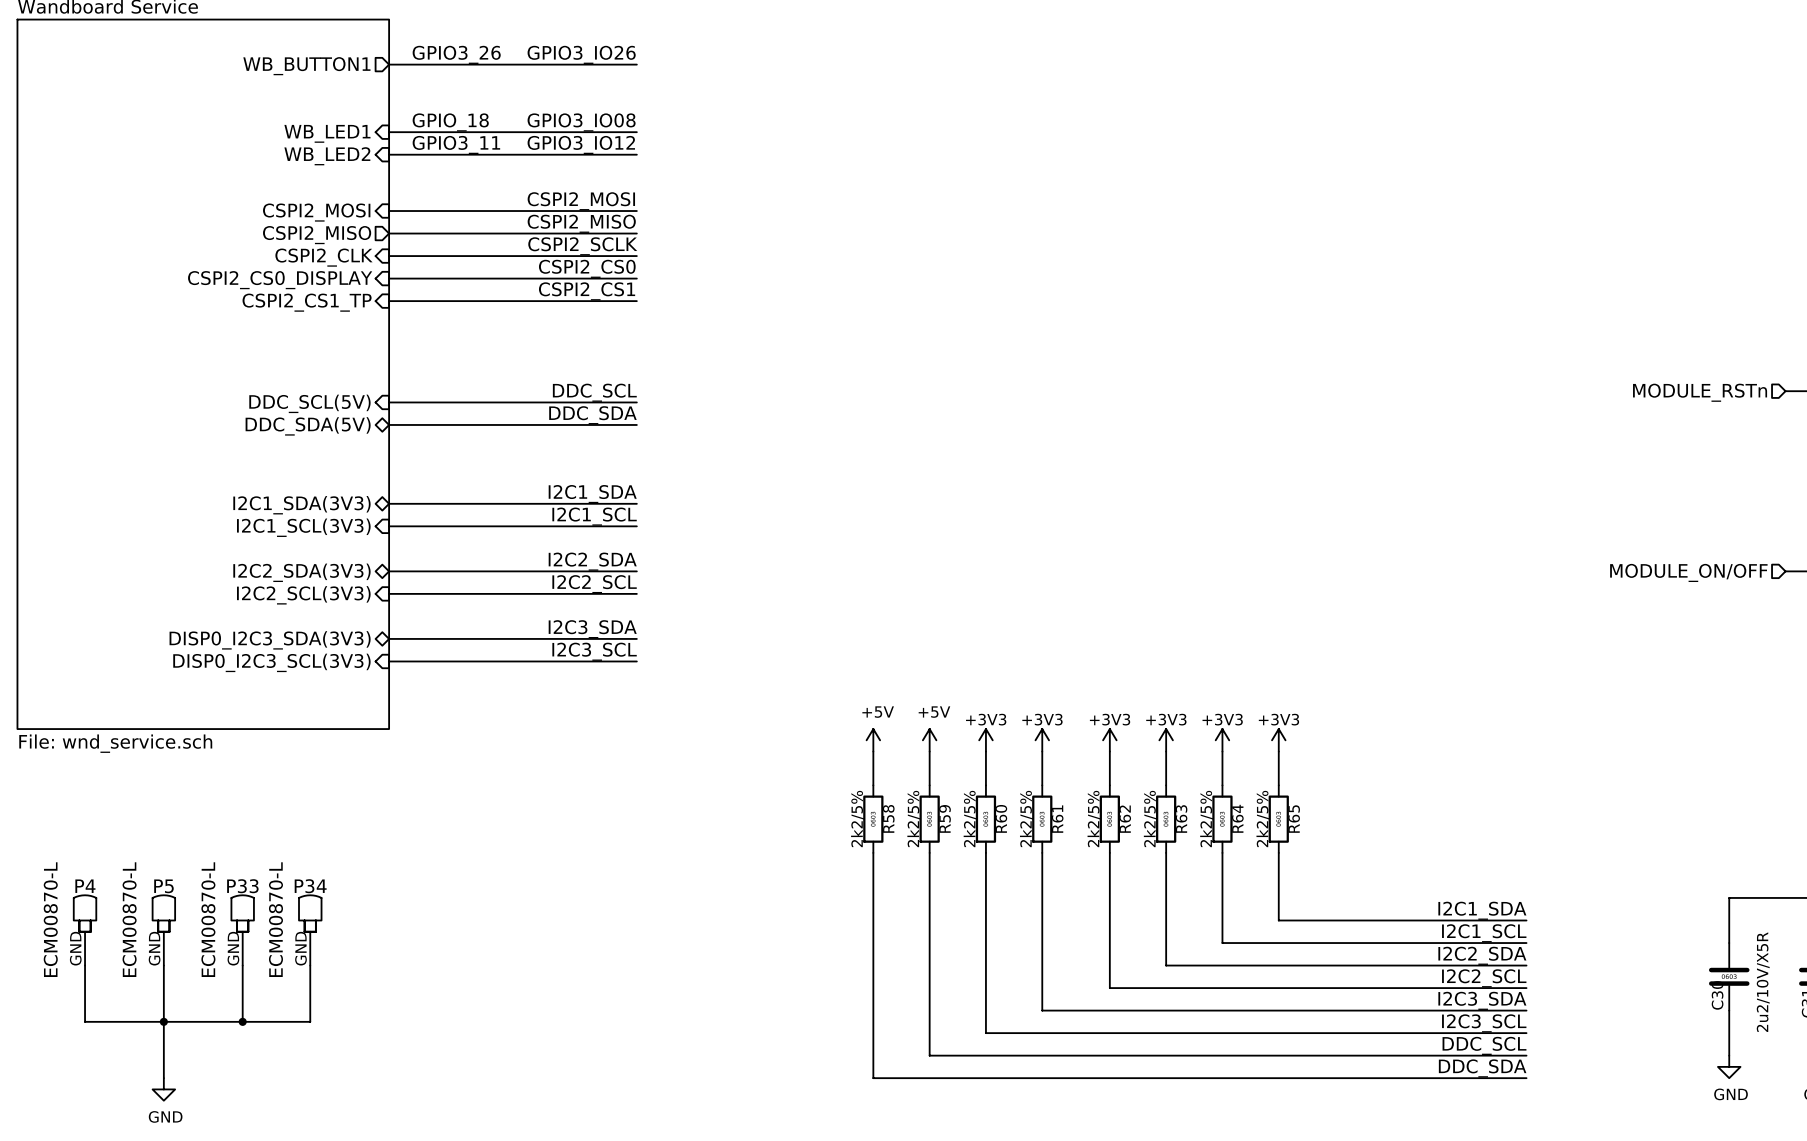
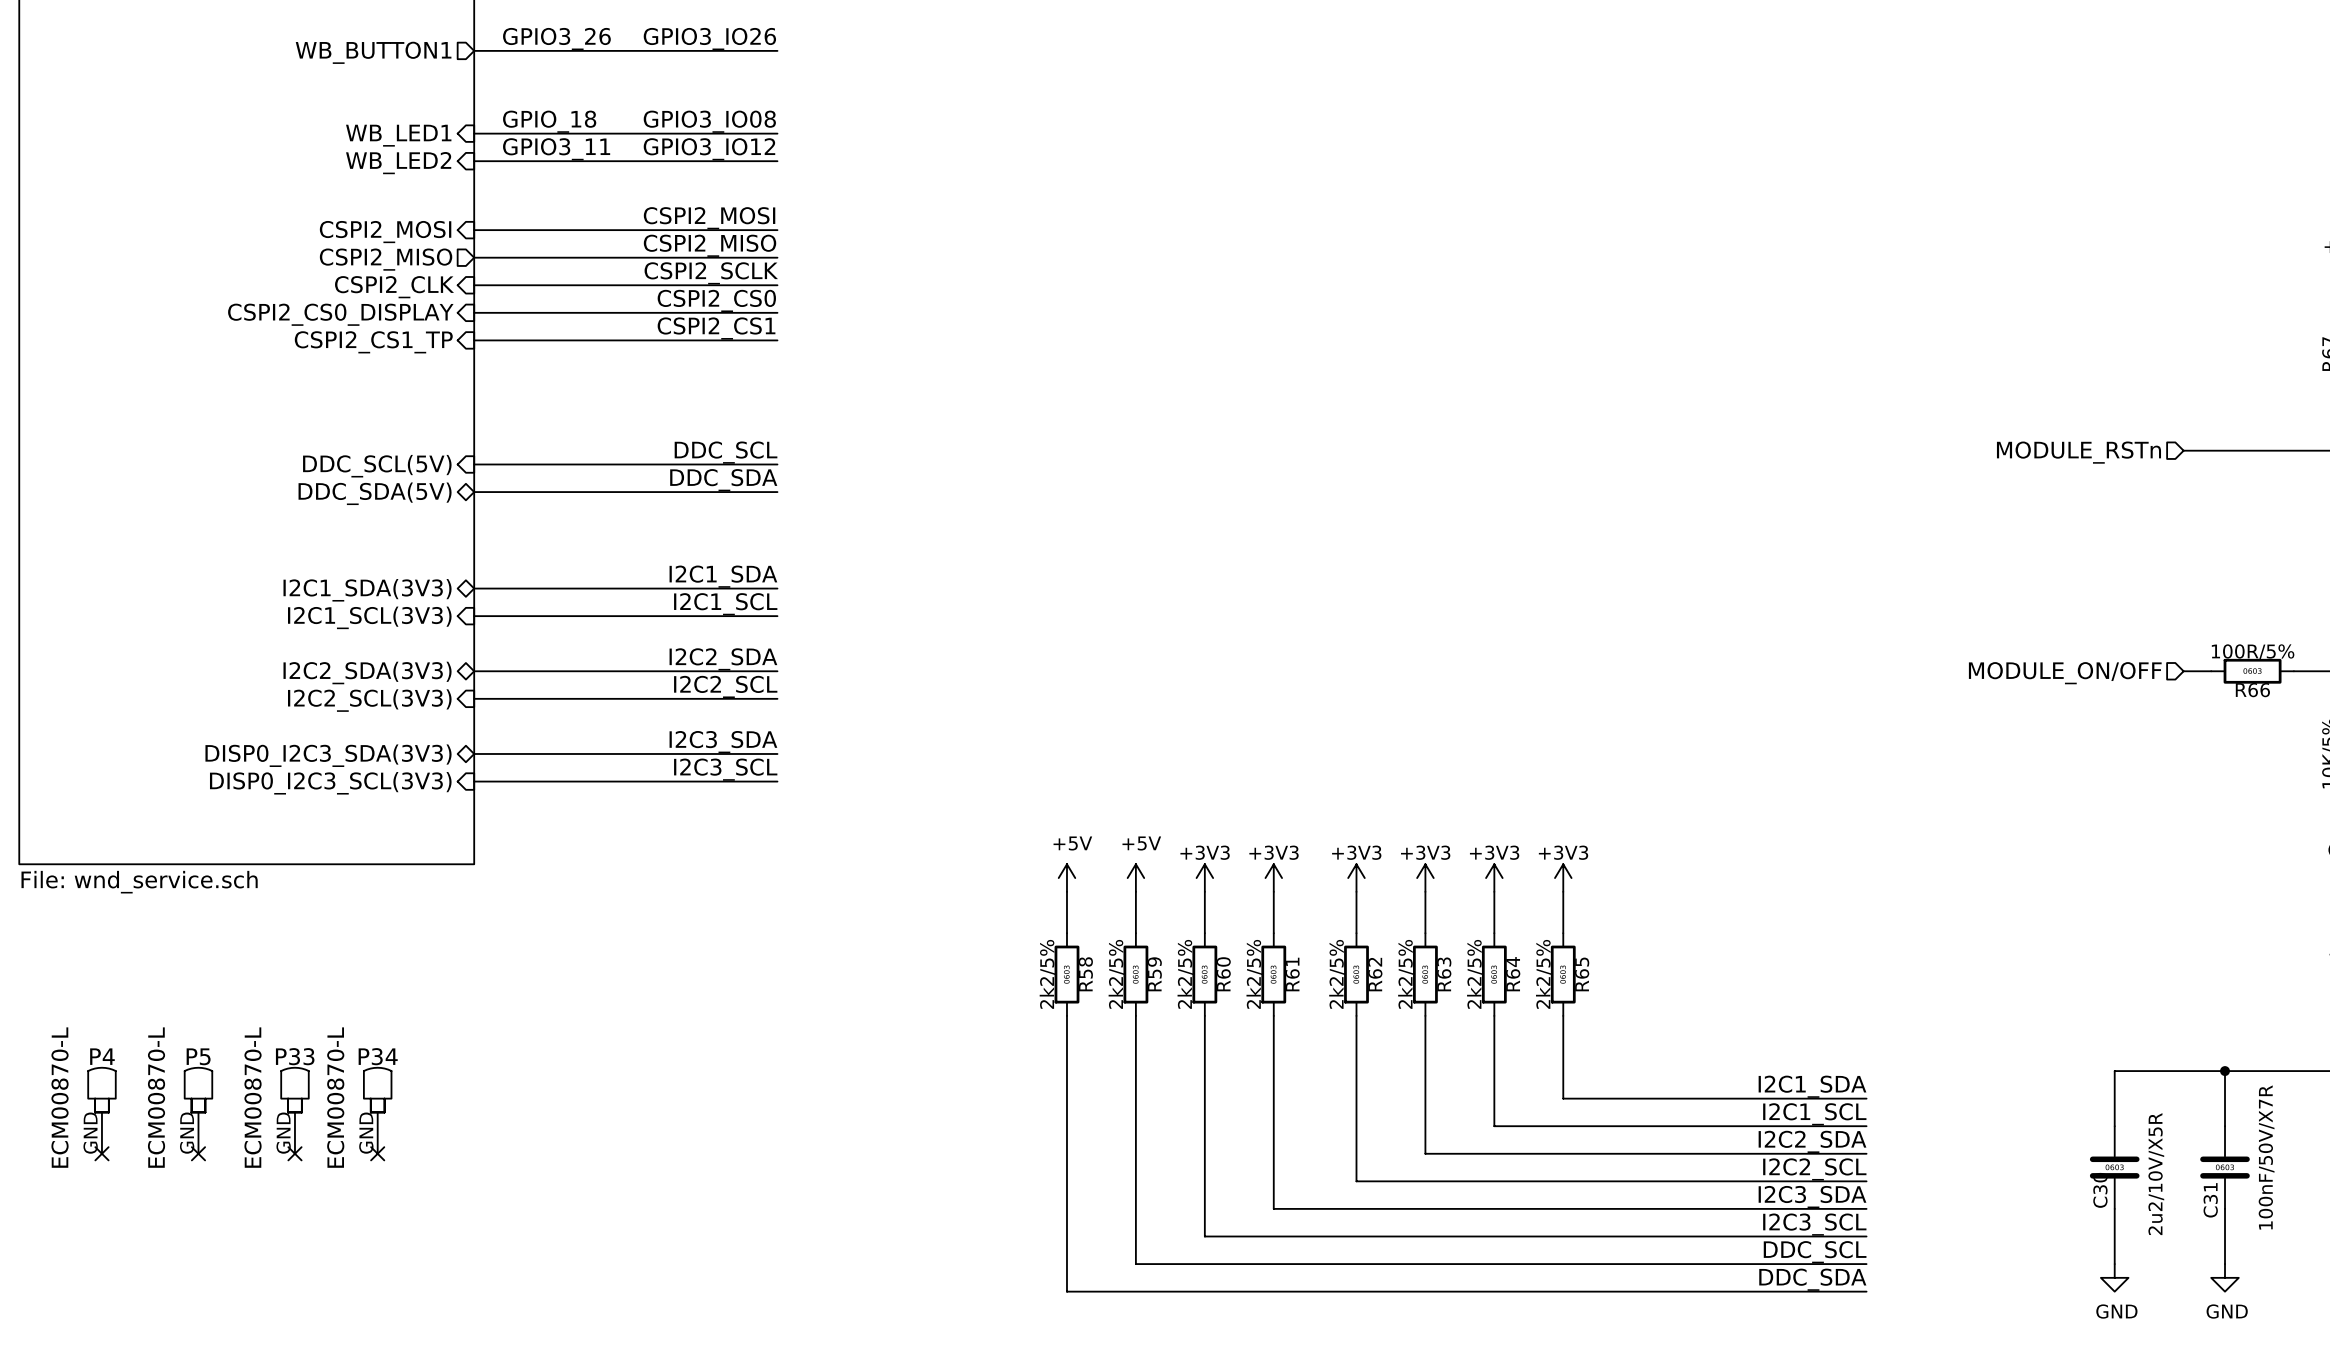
wire: (85, 965) (85, 1021) (310, 1021) (310, 965) -> none
no-connect mark: none -> (101, 1153)
wire: (163, 965) (163, 1078) -> none
no-connect mark: none -> (198, 1153)
wire: (242, 965) (242, 1021) -> none
no-connect mark: none -> (294, 1153)
no-connect mark: none -> (377, 1153)
junction: (163, 1021) -> none
junction: (242, 1021) -> none
power symbol: GND (163, 1089) -> none

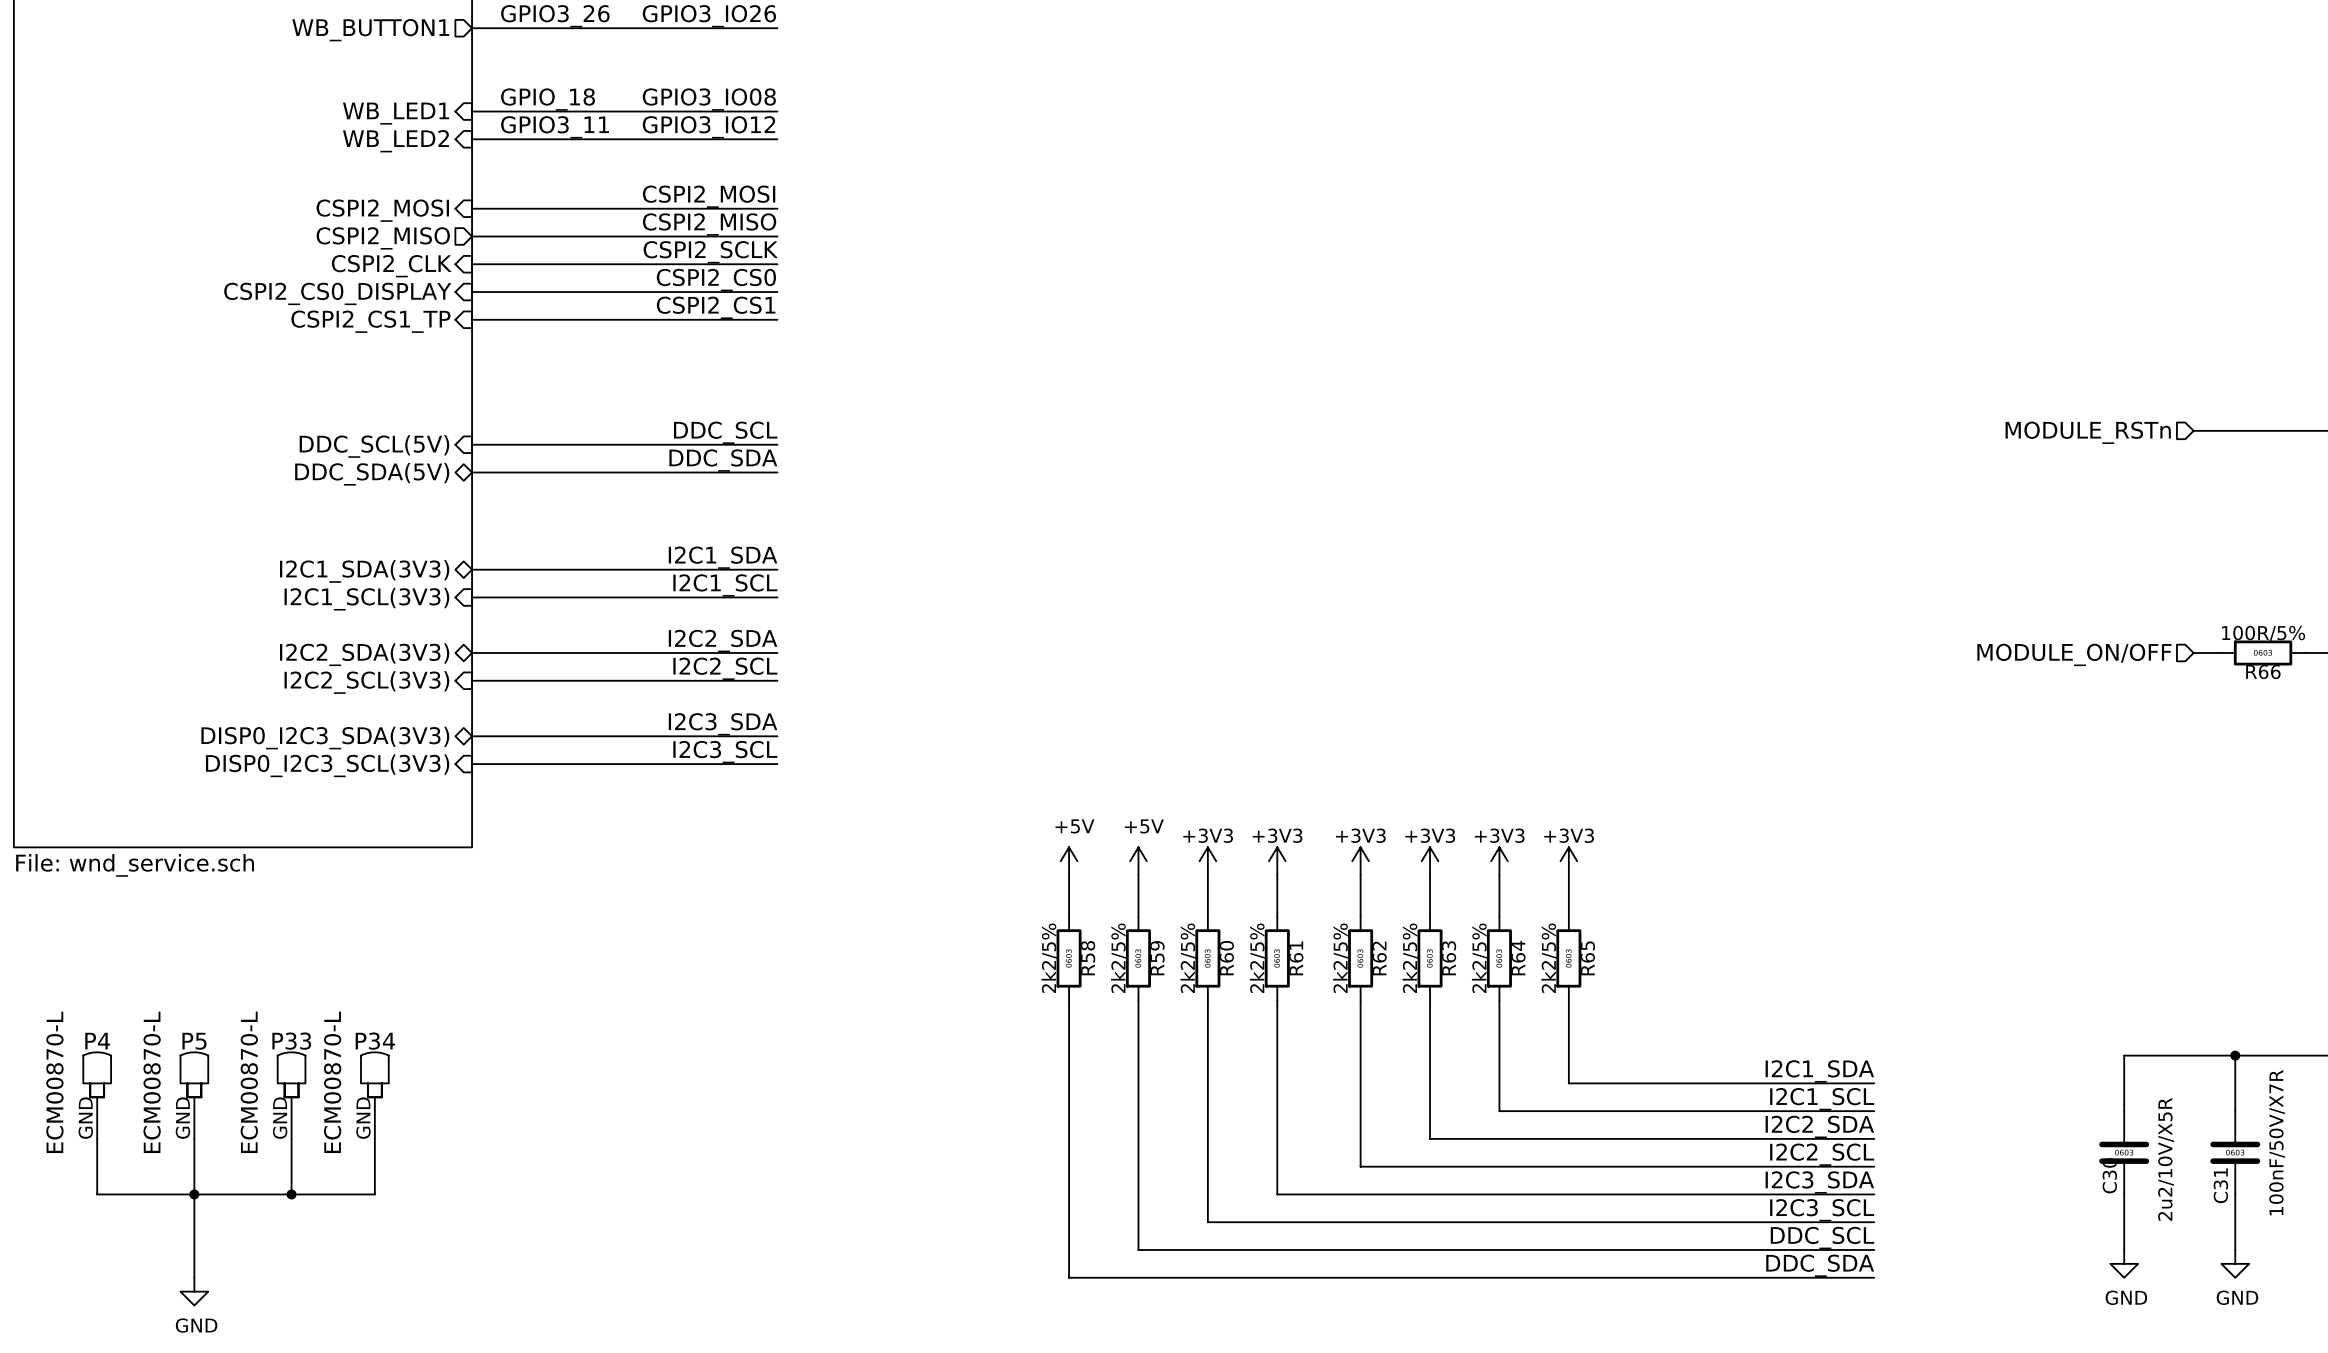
wire: none -> (97, 1138) (97, 1194) (374, 1194) (374, 1138)
no-connect mark: (101, 1153) -> none
wire: none -> (194, 1138) (194, 1277)
no-connect mark: (198, 1153) -> none
wire: none -> (291, 1138) (291, 1194)
no-connect mark: (294, 1153) -> none
no-connect mark: (377, 1153) -> none
junction: none -> (194, 1194)
junction: none -> (291, 1194)
power symbol: none -> GND (194, 1291)

